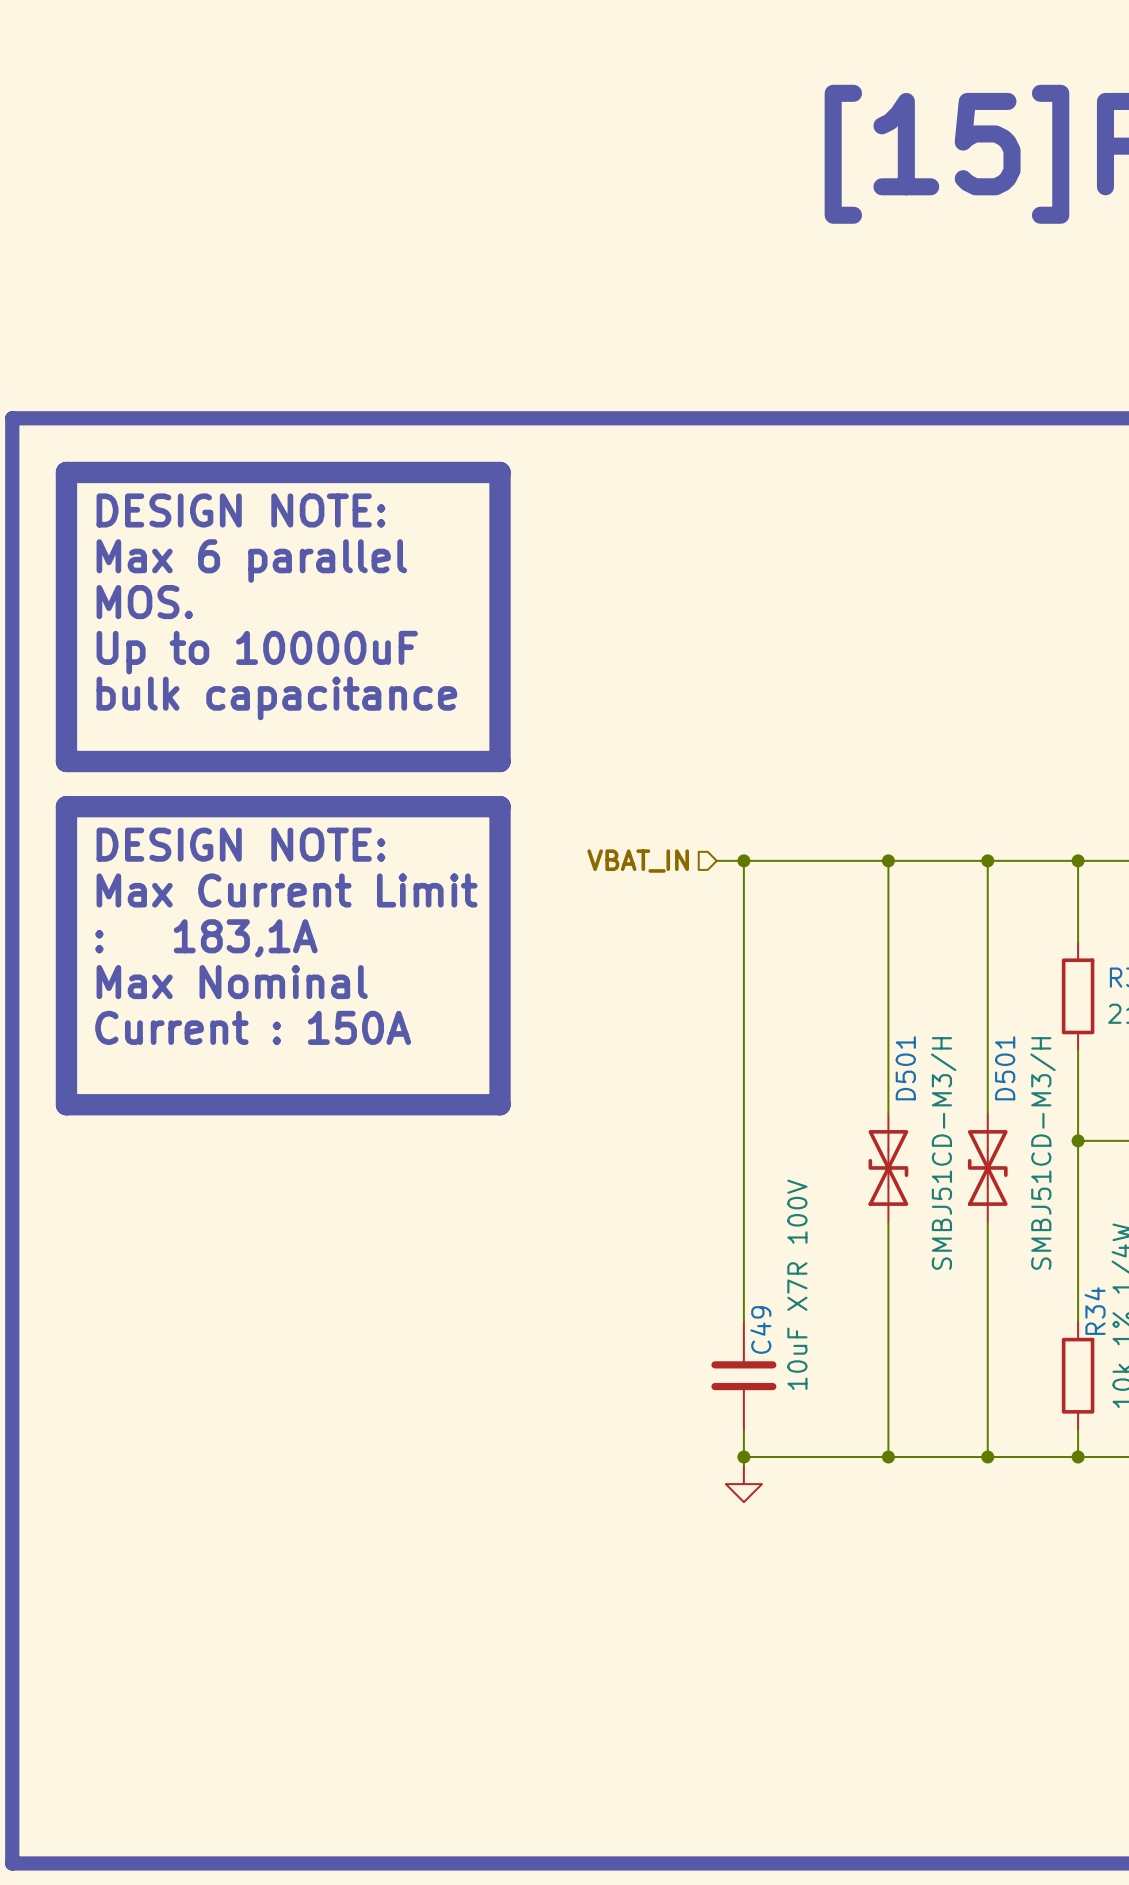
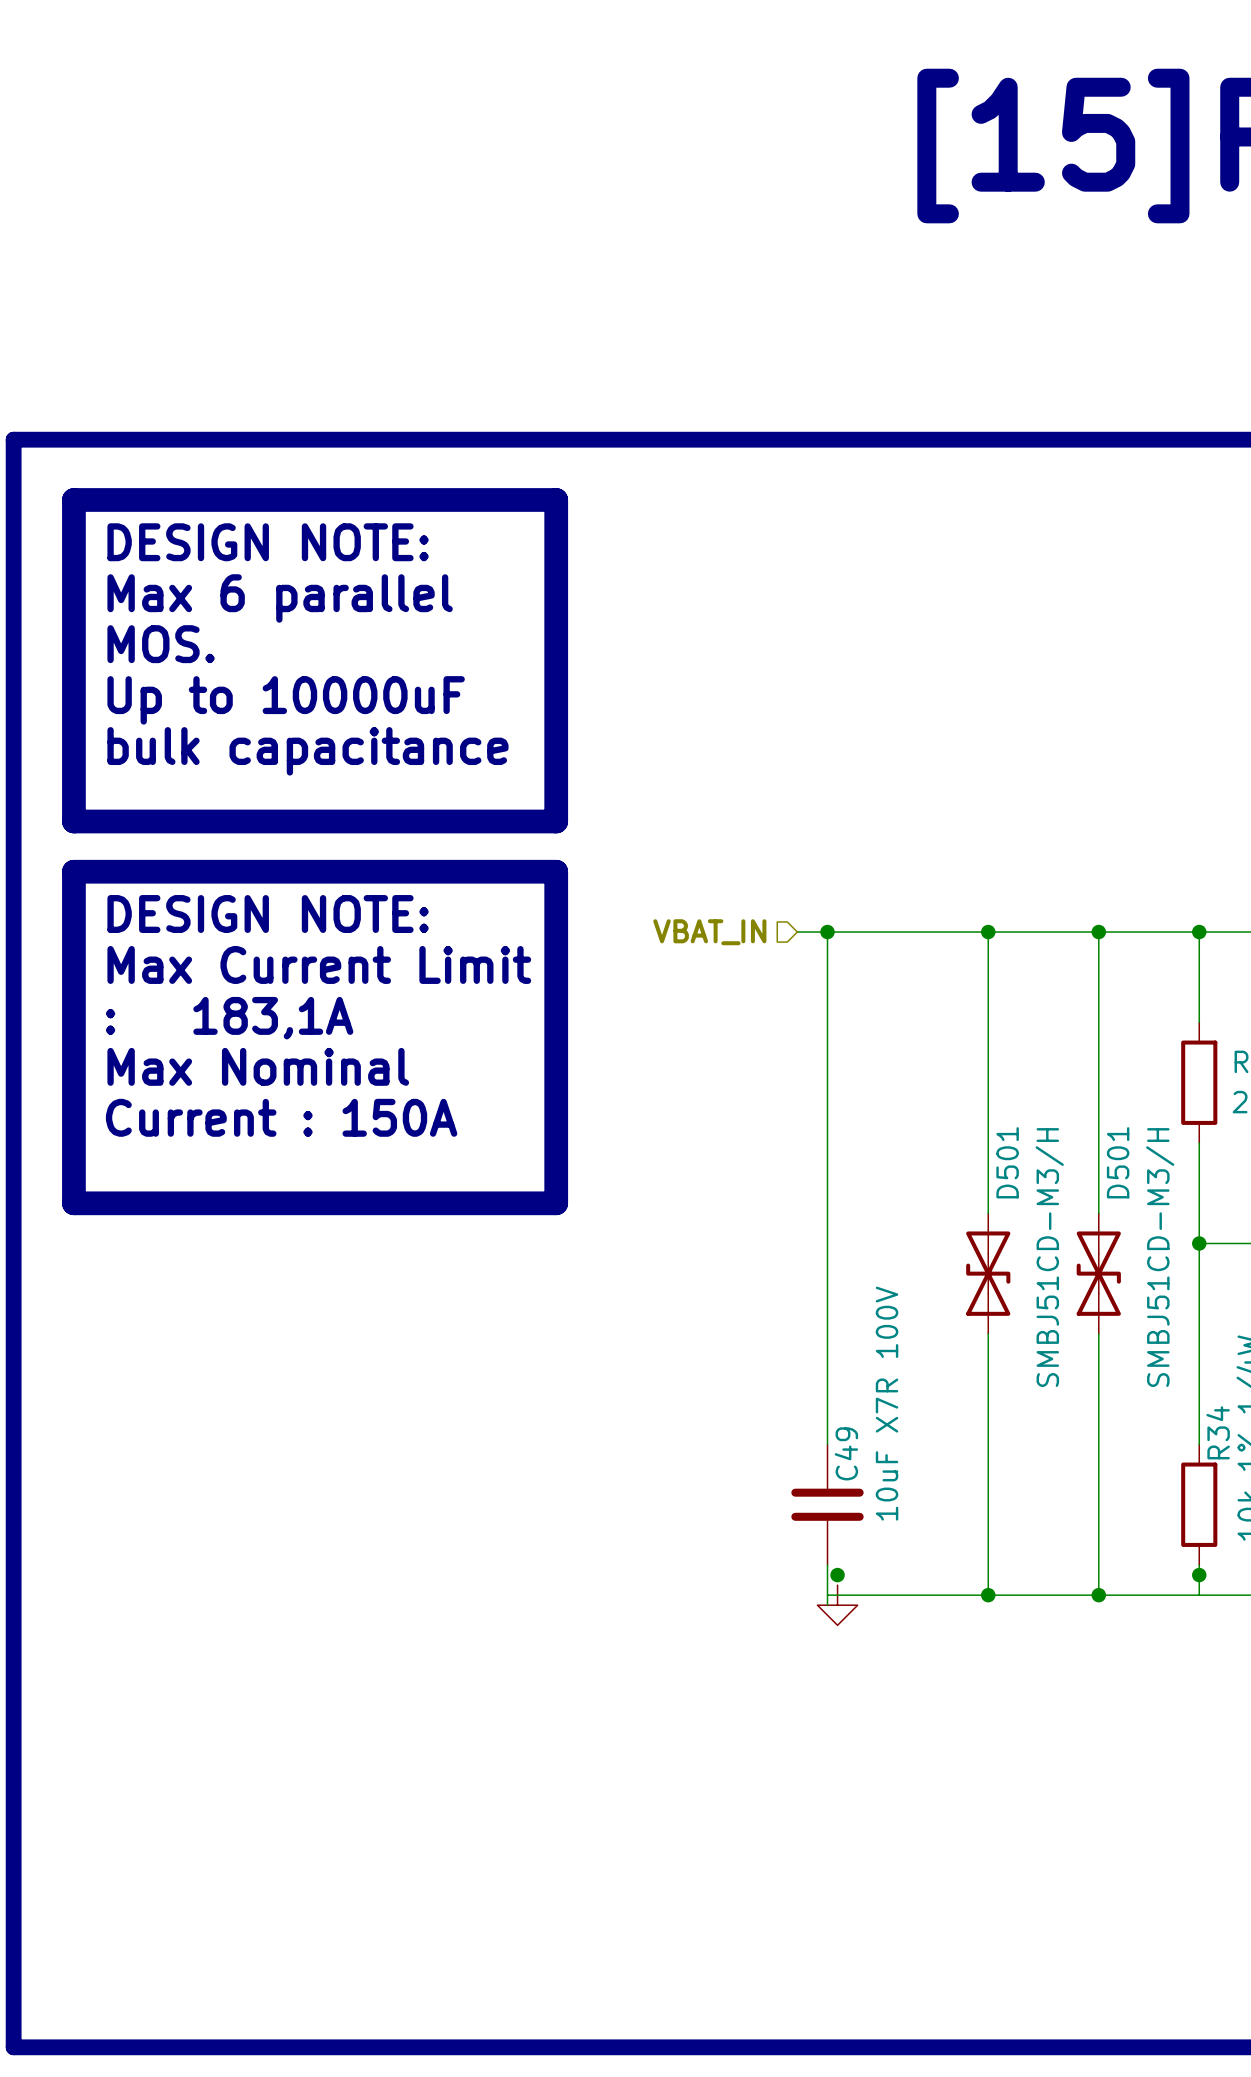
junction position: (743, 1457) -> (837, 1575)
junction position: (1078, 1457) -> (1199, 1575)
power symbol position: (743, 1484) -> (837, 1605)

